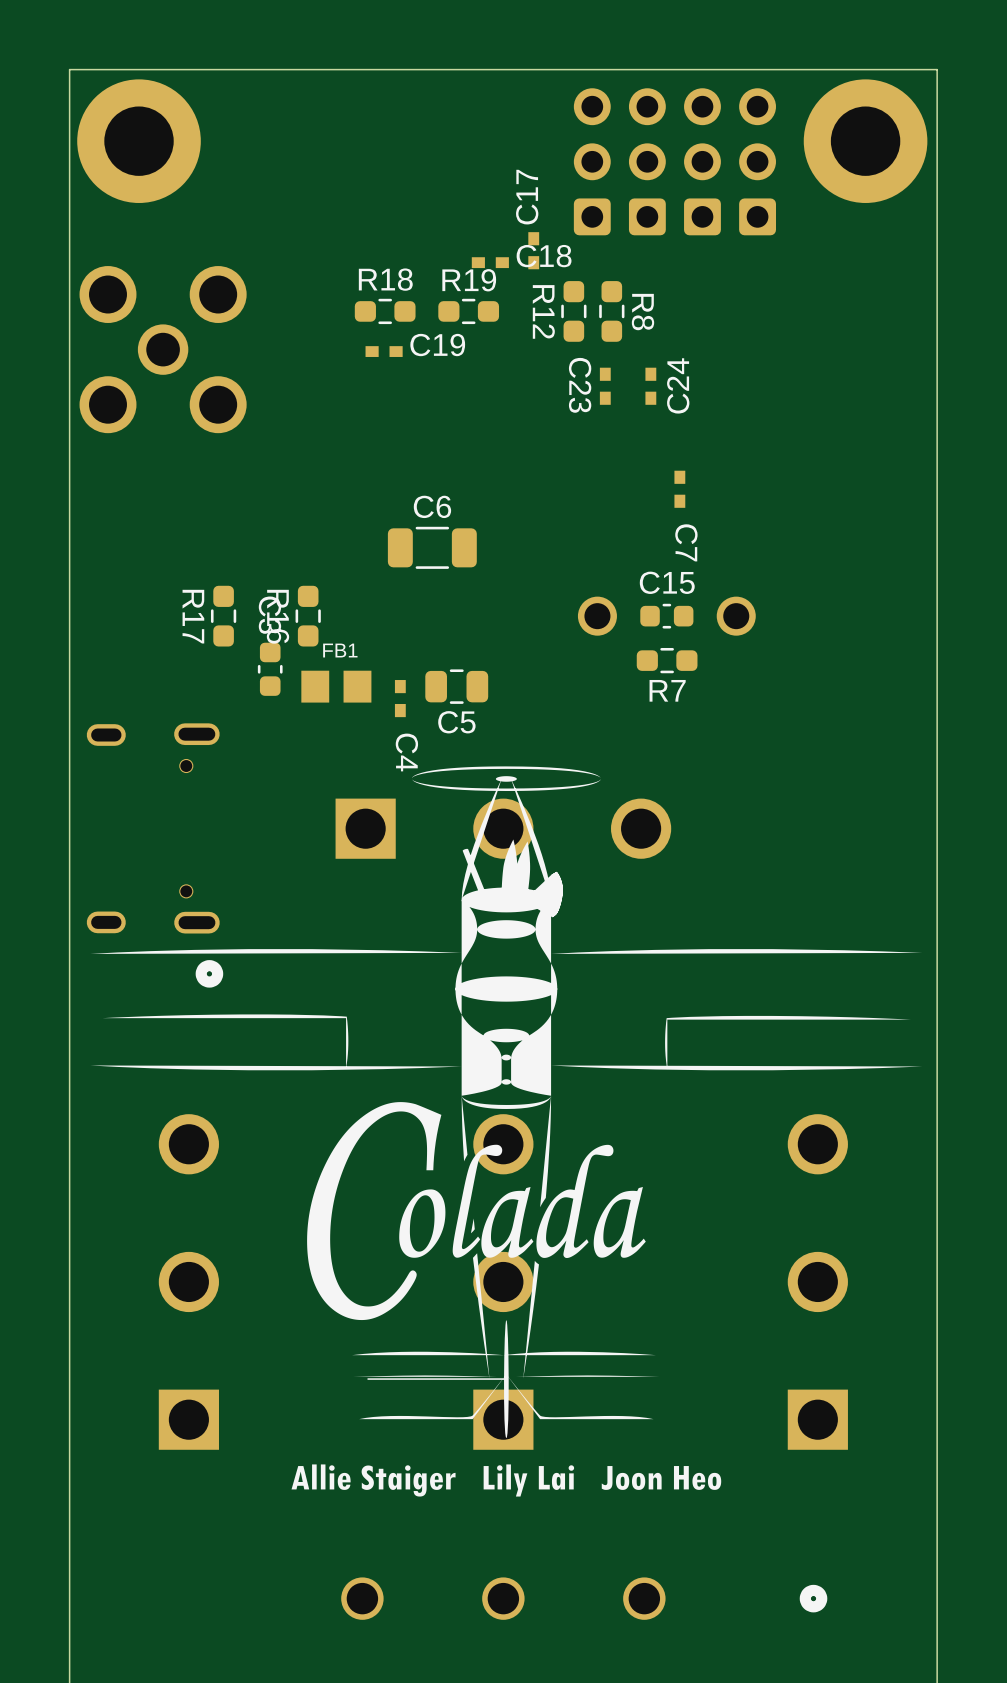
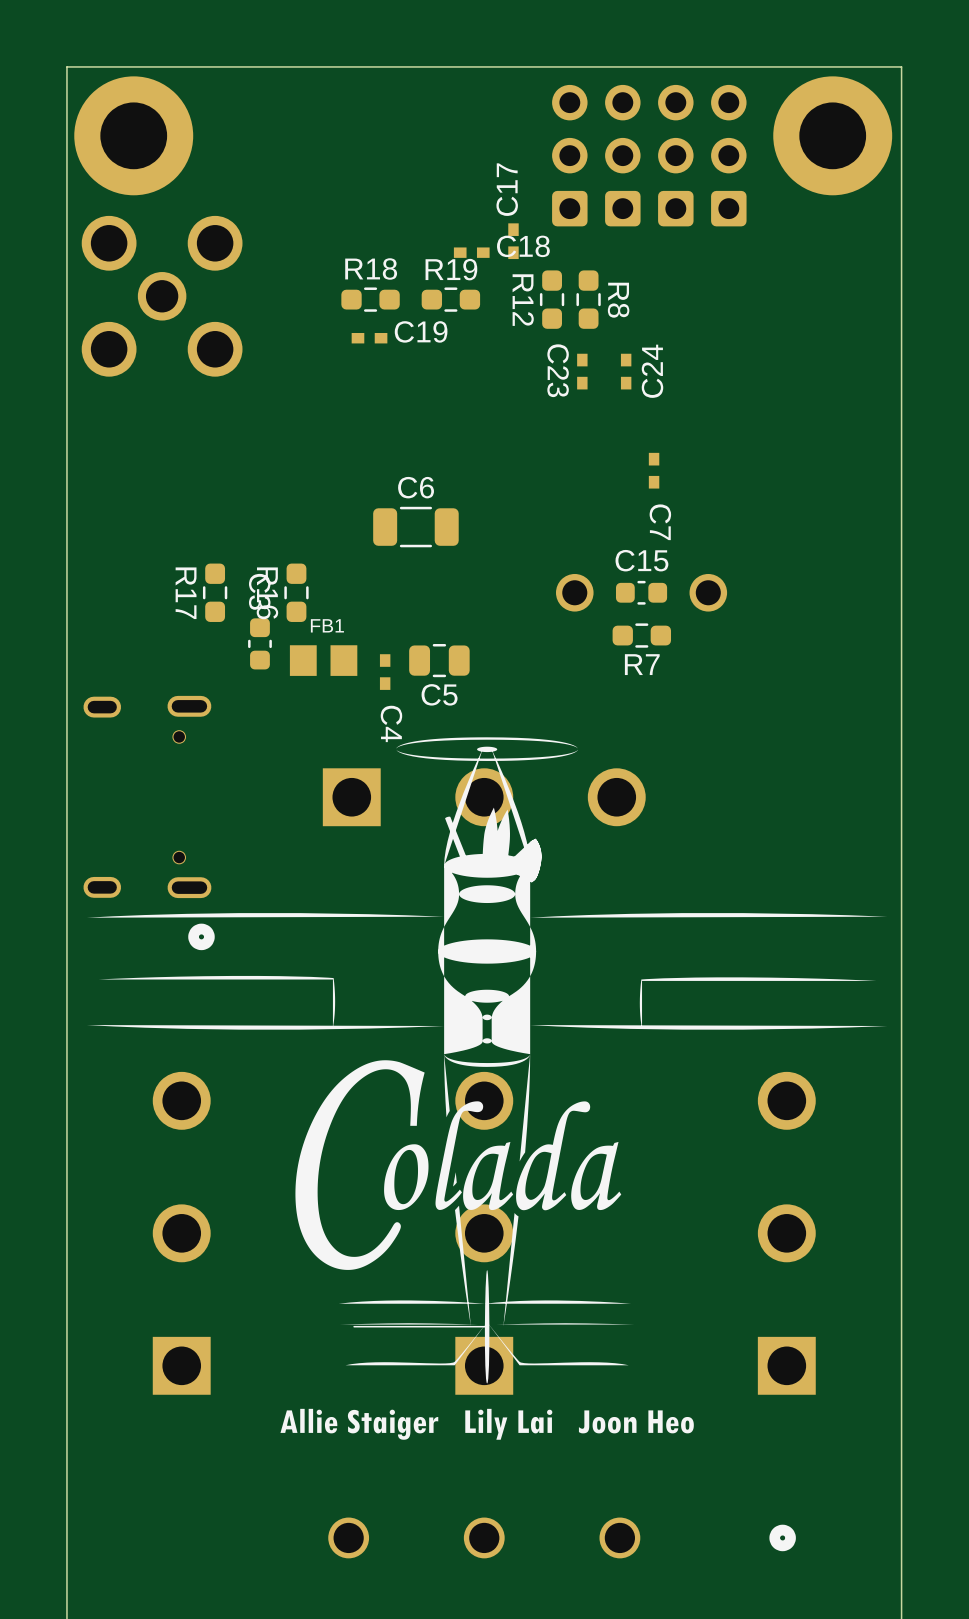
part position: (163, 349) -> (162, 296)

